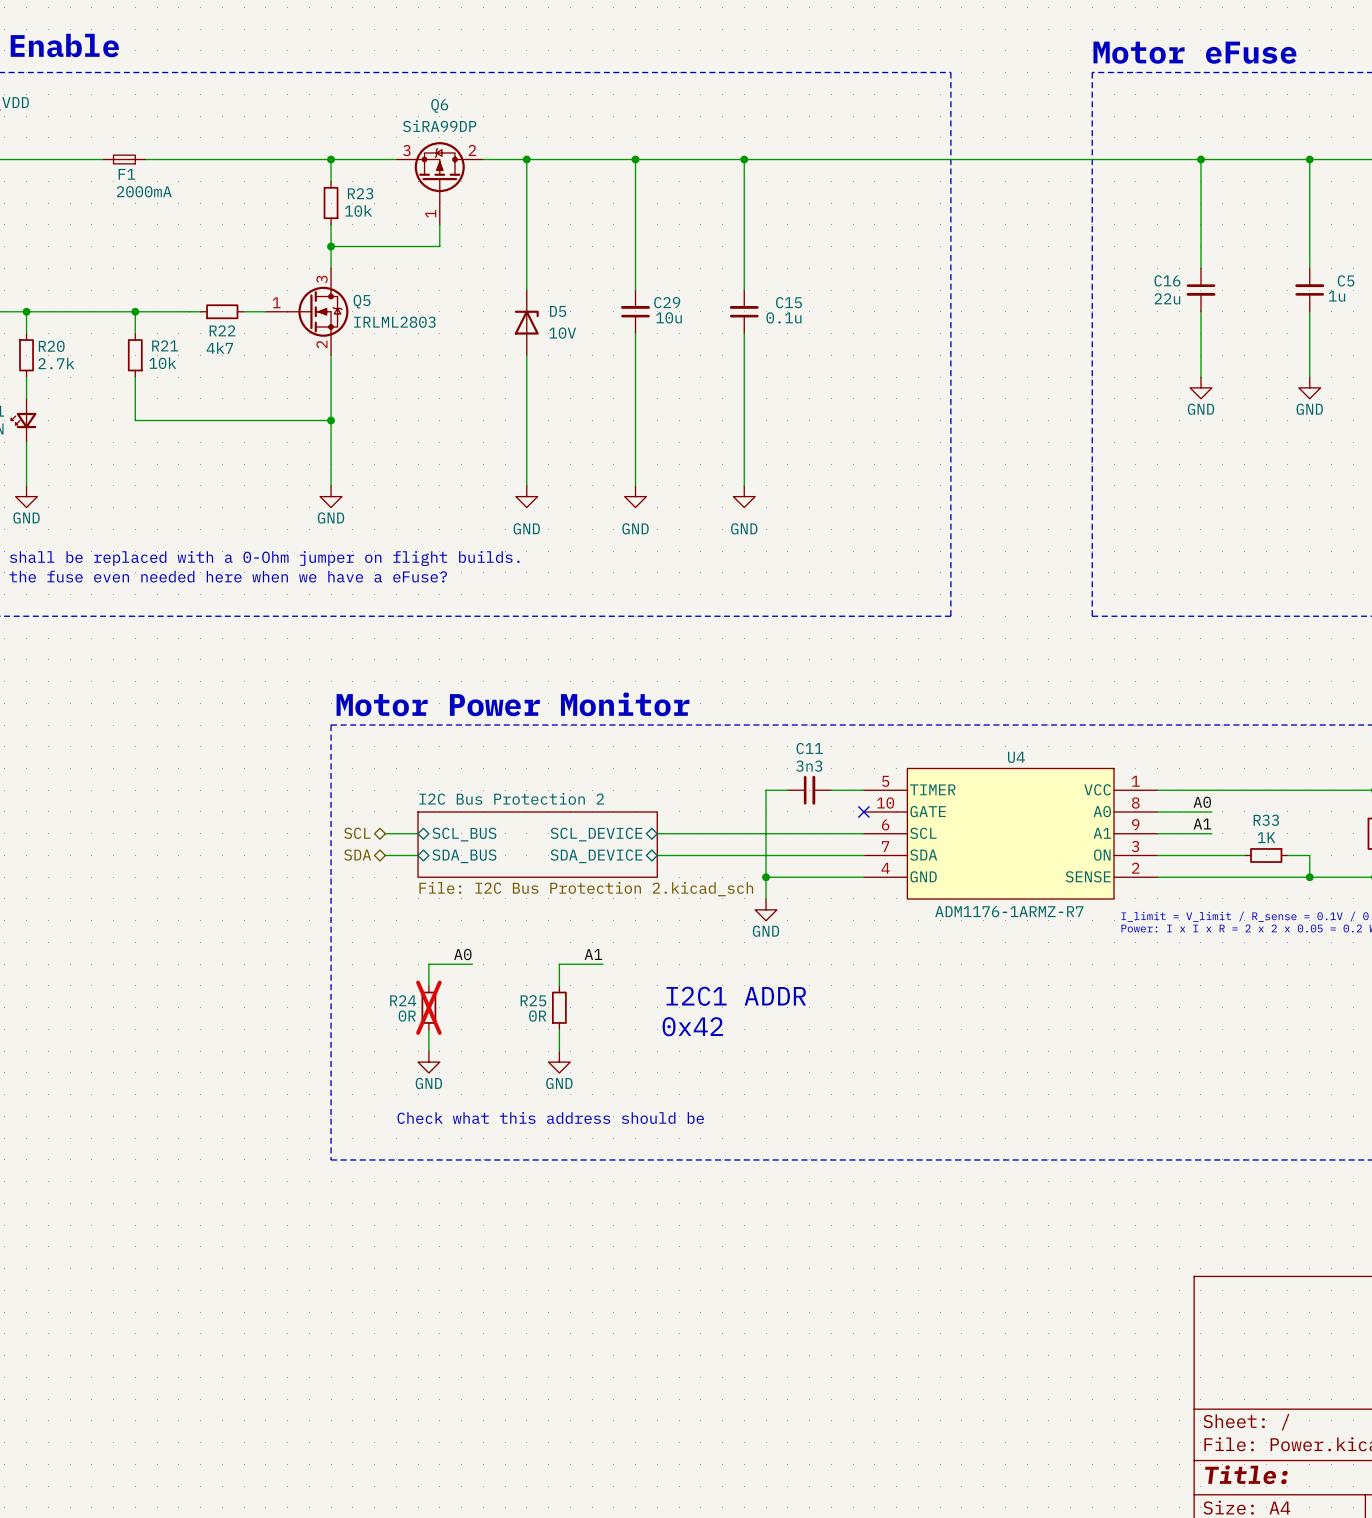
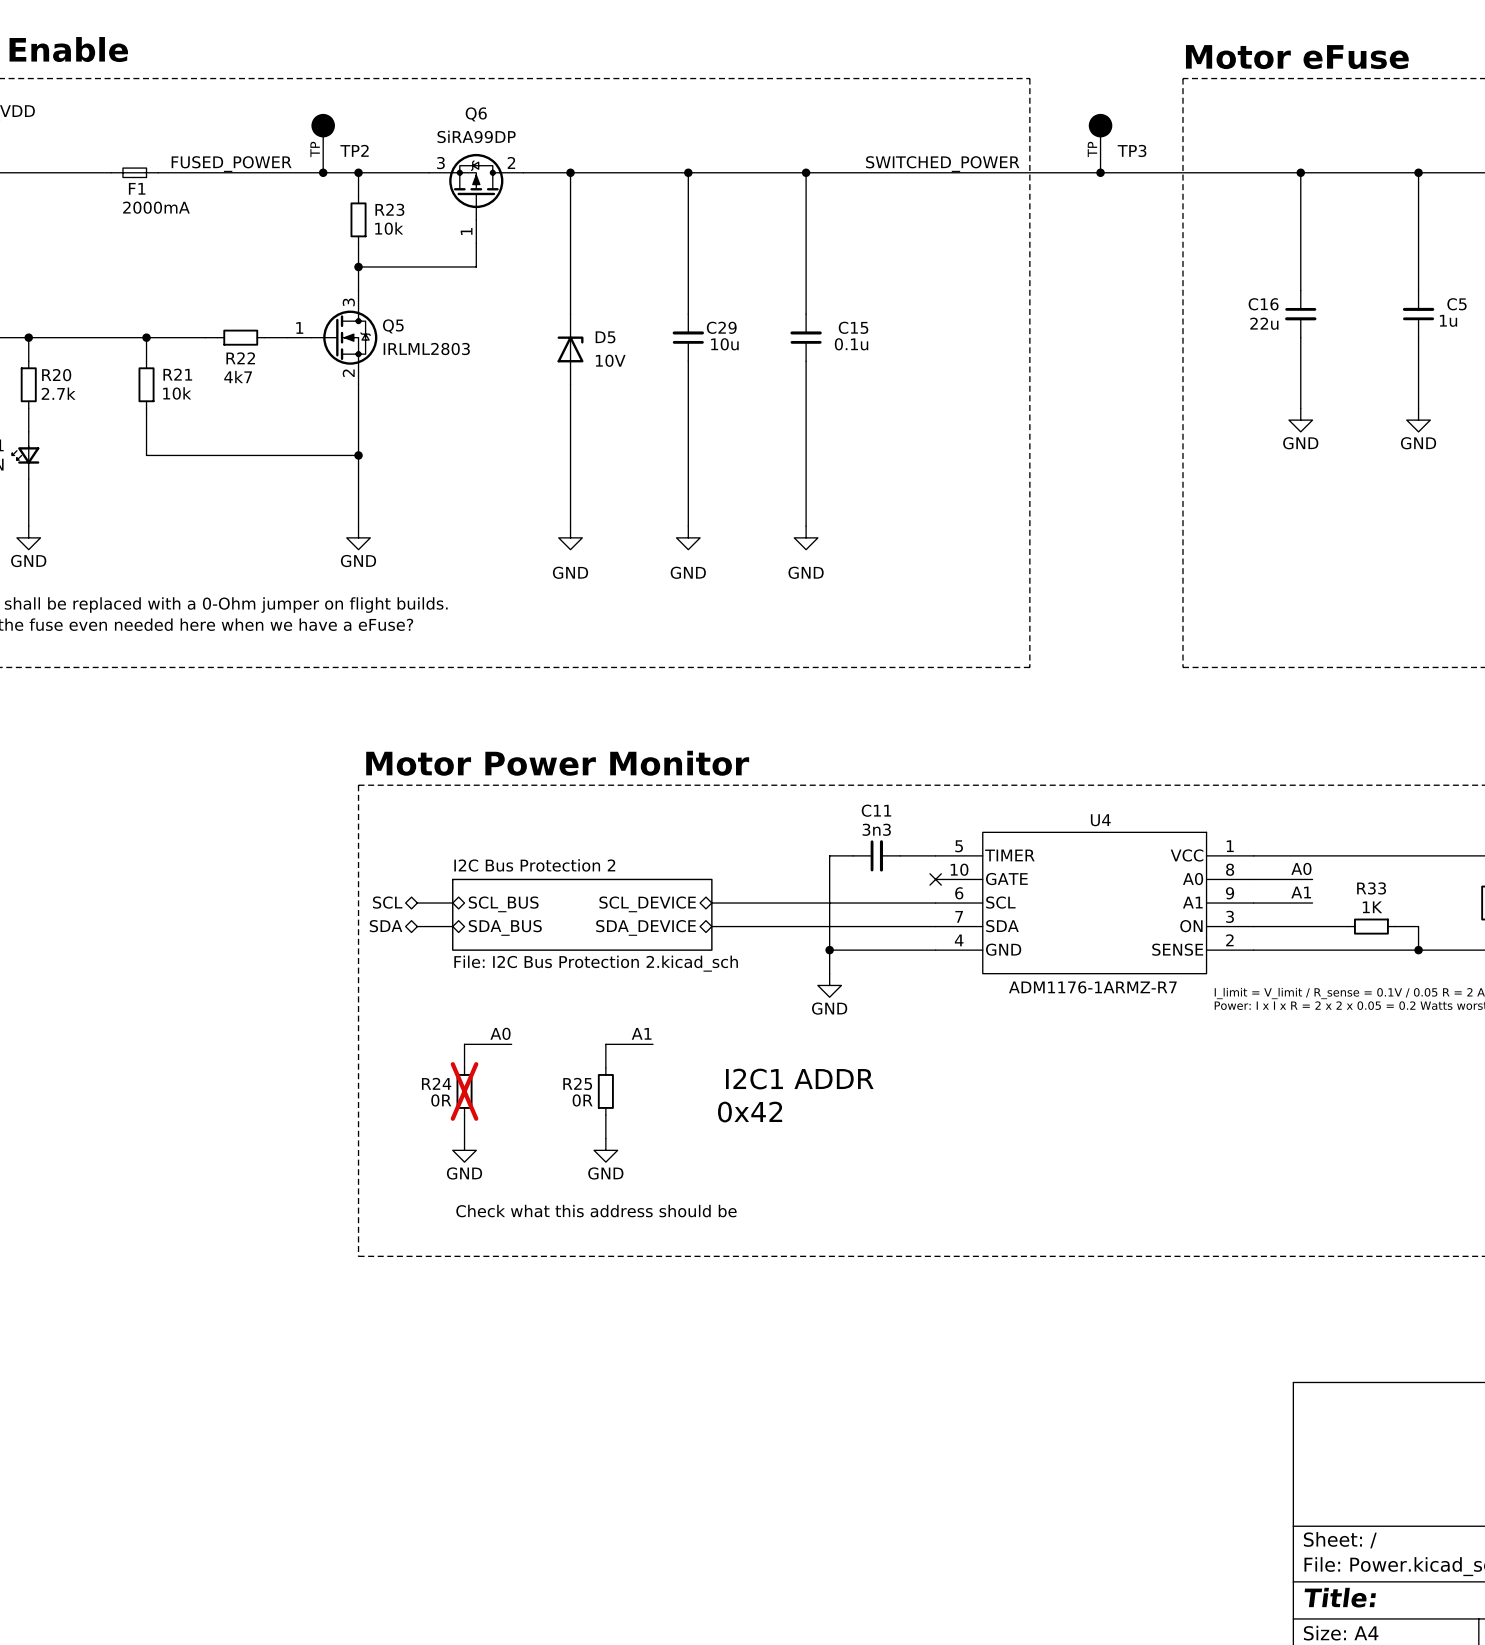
TP2: none -> (323, 143)
TP3: none -> (1100, 143)
label: none -> FUSED_POWER (231, 164)
label: none -> SWITCHED_POWER (942, 164)
junction: none -> (323, 172)
junction: none -> (1100, 172)

